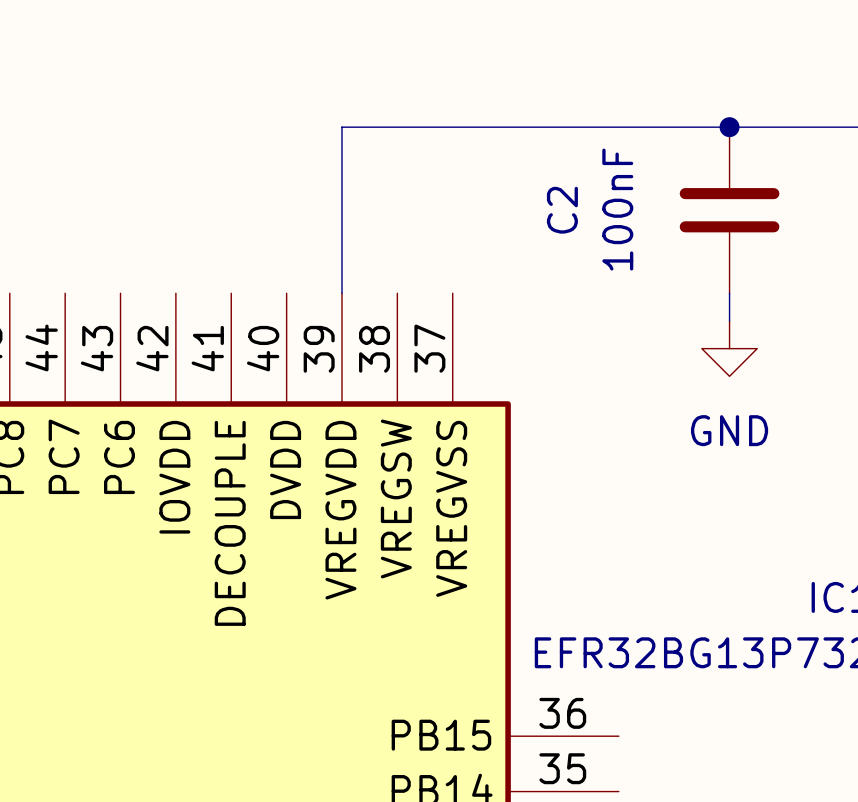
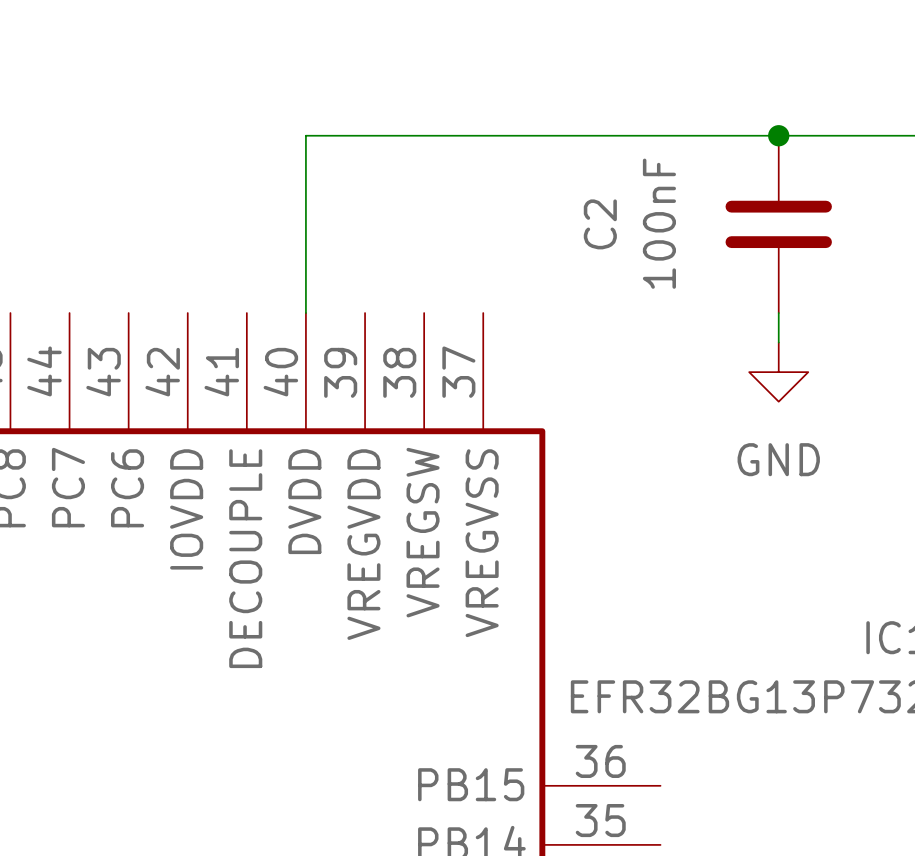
wire: (341, 127) (341, 293) -> (365, 135) (305, 135) (305, 313)

